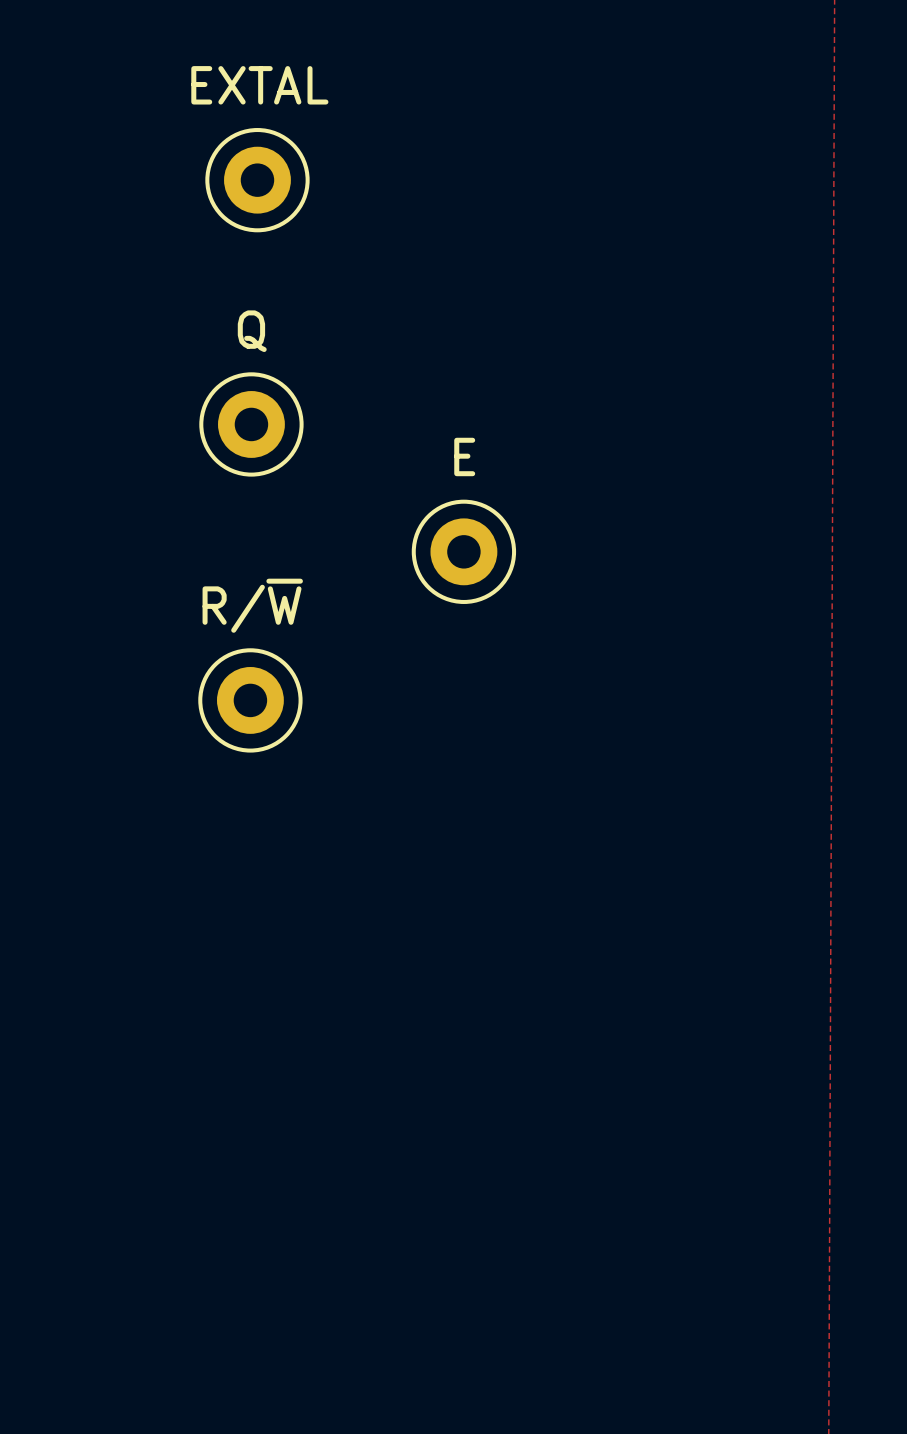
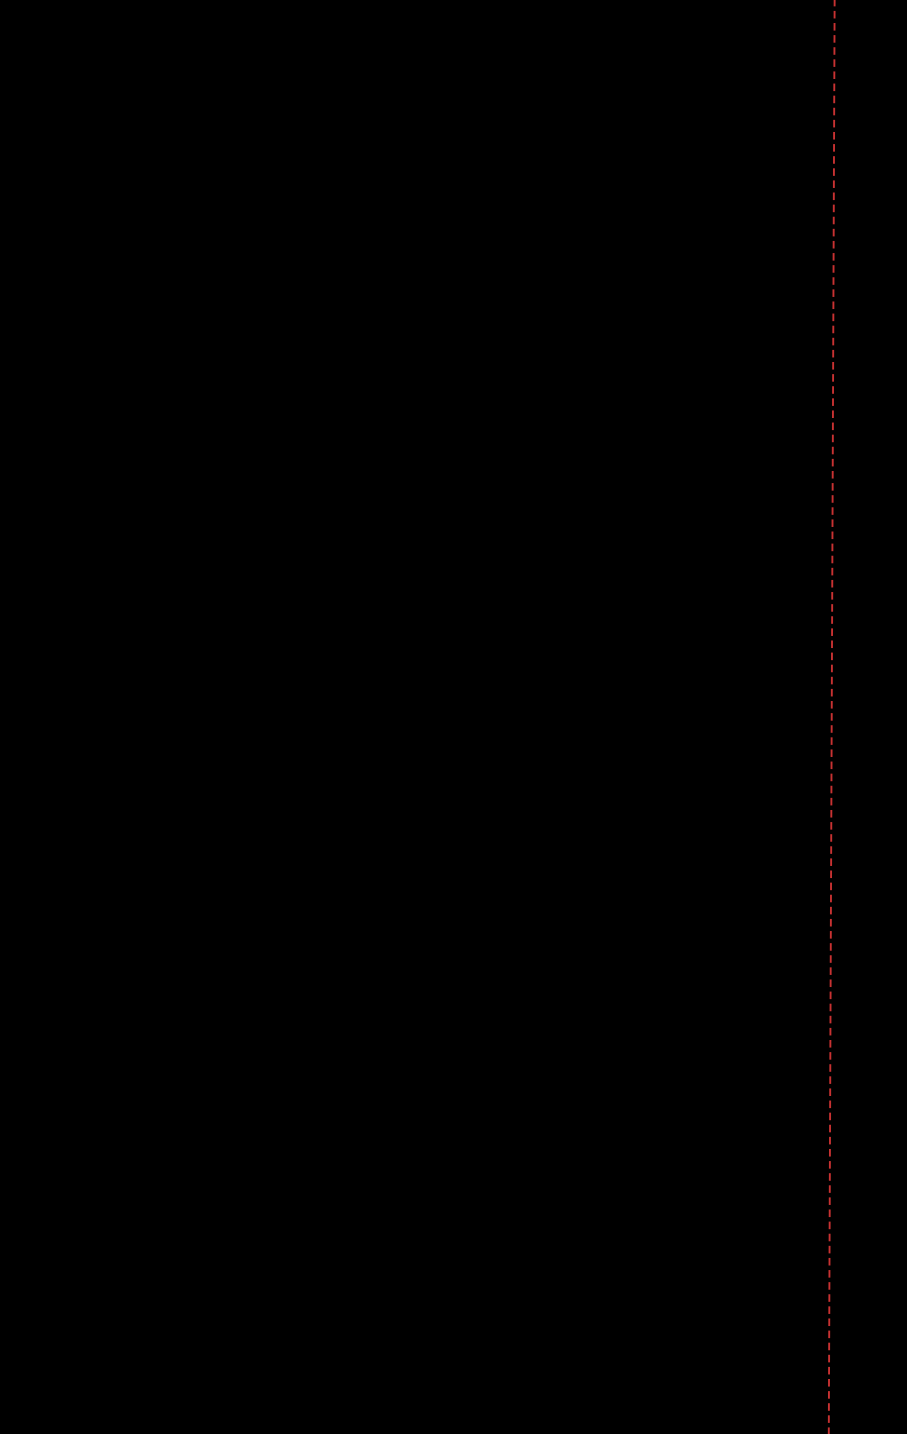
part: EXTAL (257, 180) -> none
part: Q (251, 424) -> none
part: E (463, 551) -> none
part: R/~{W} (250, 700) -> none

